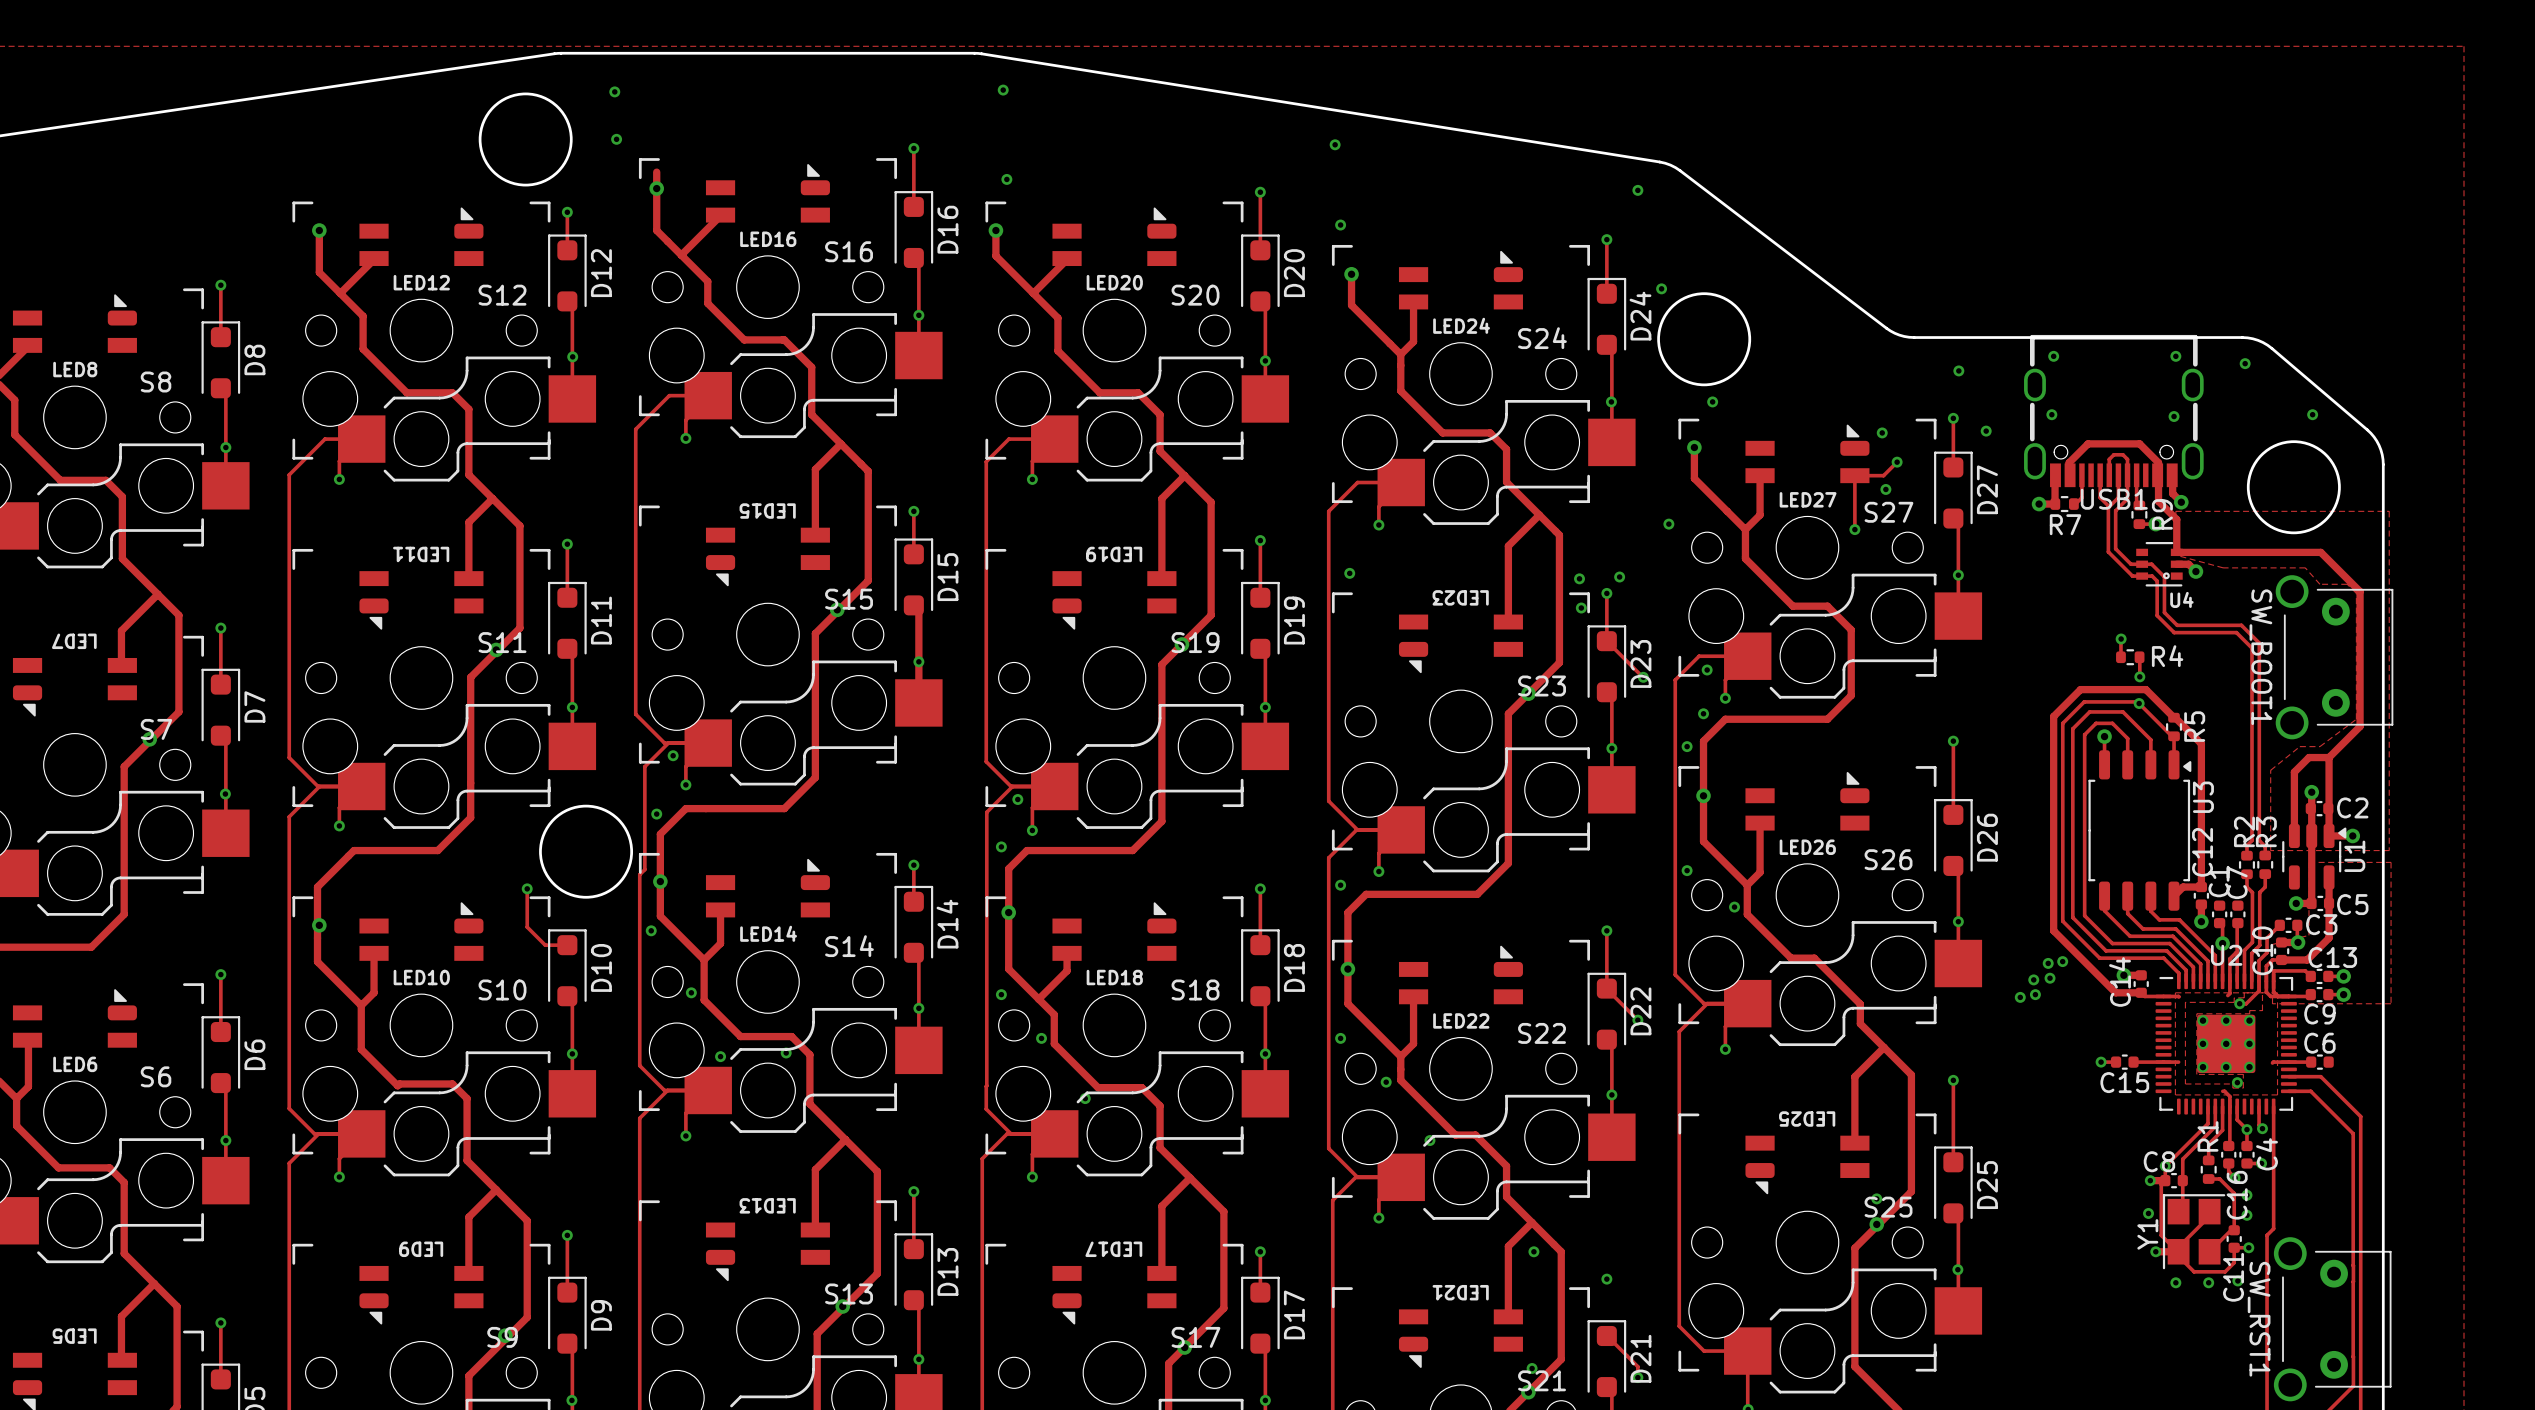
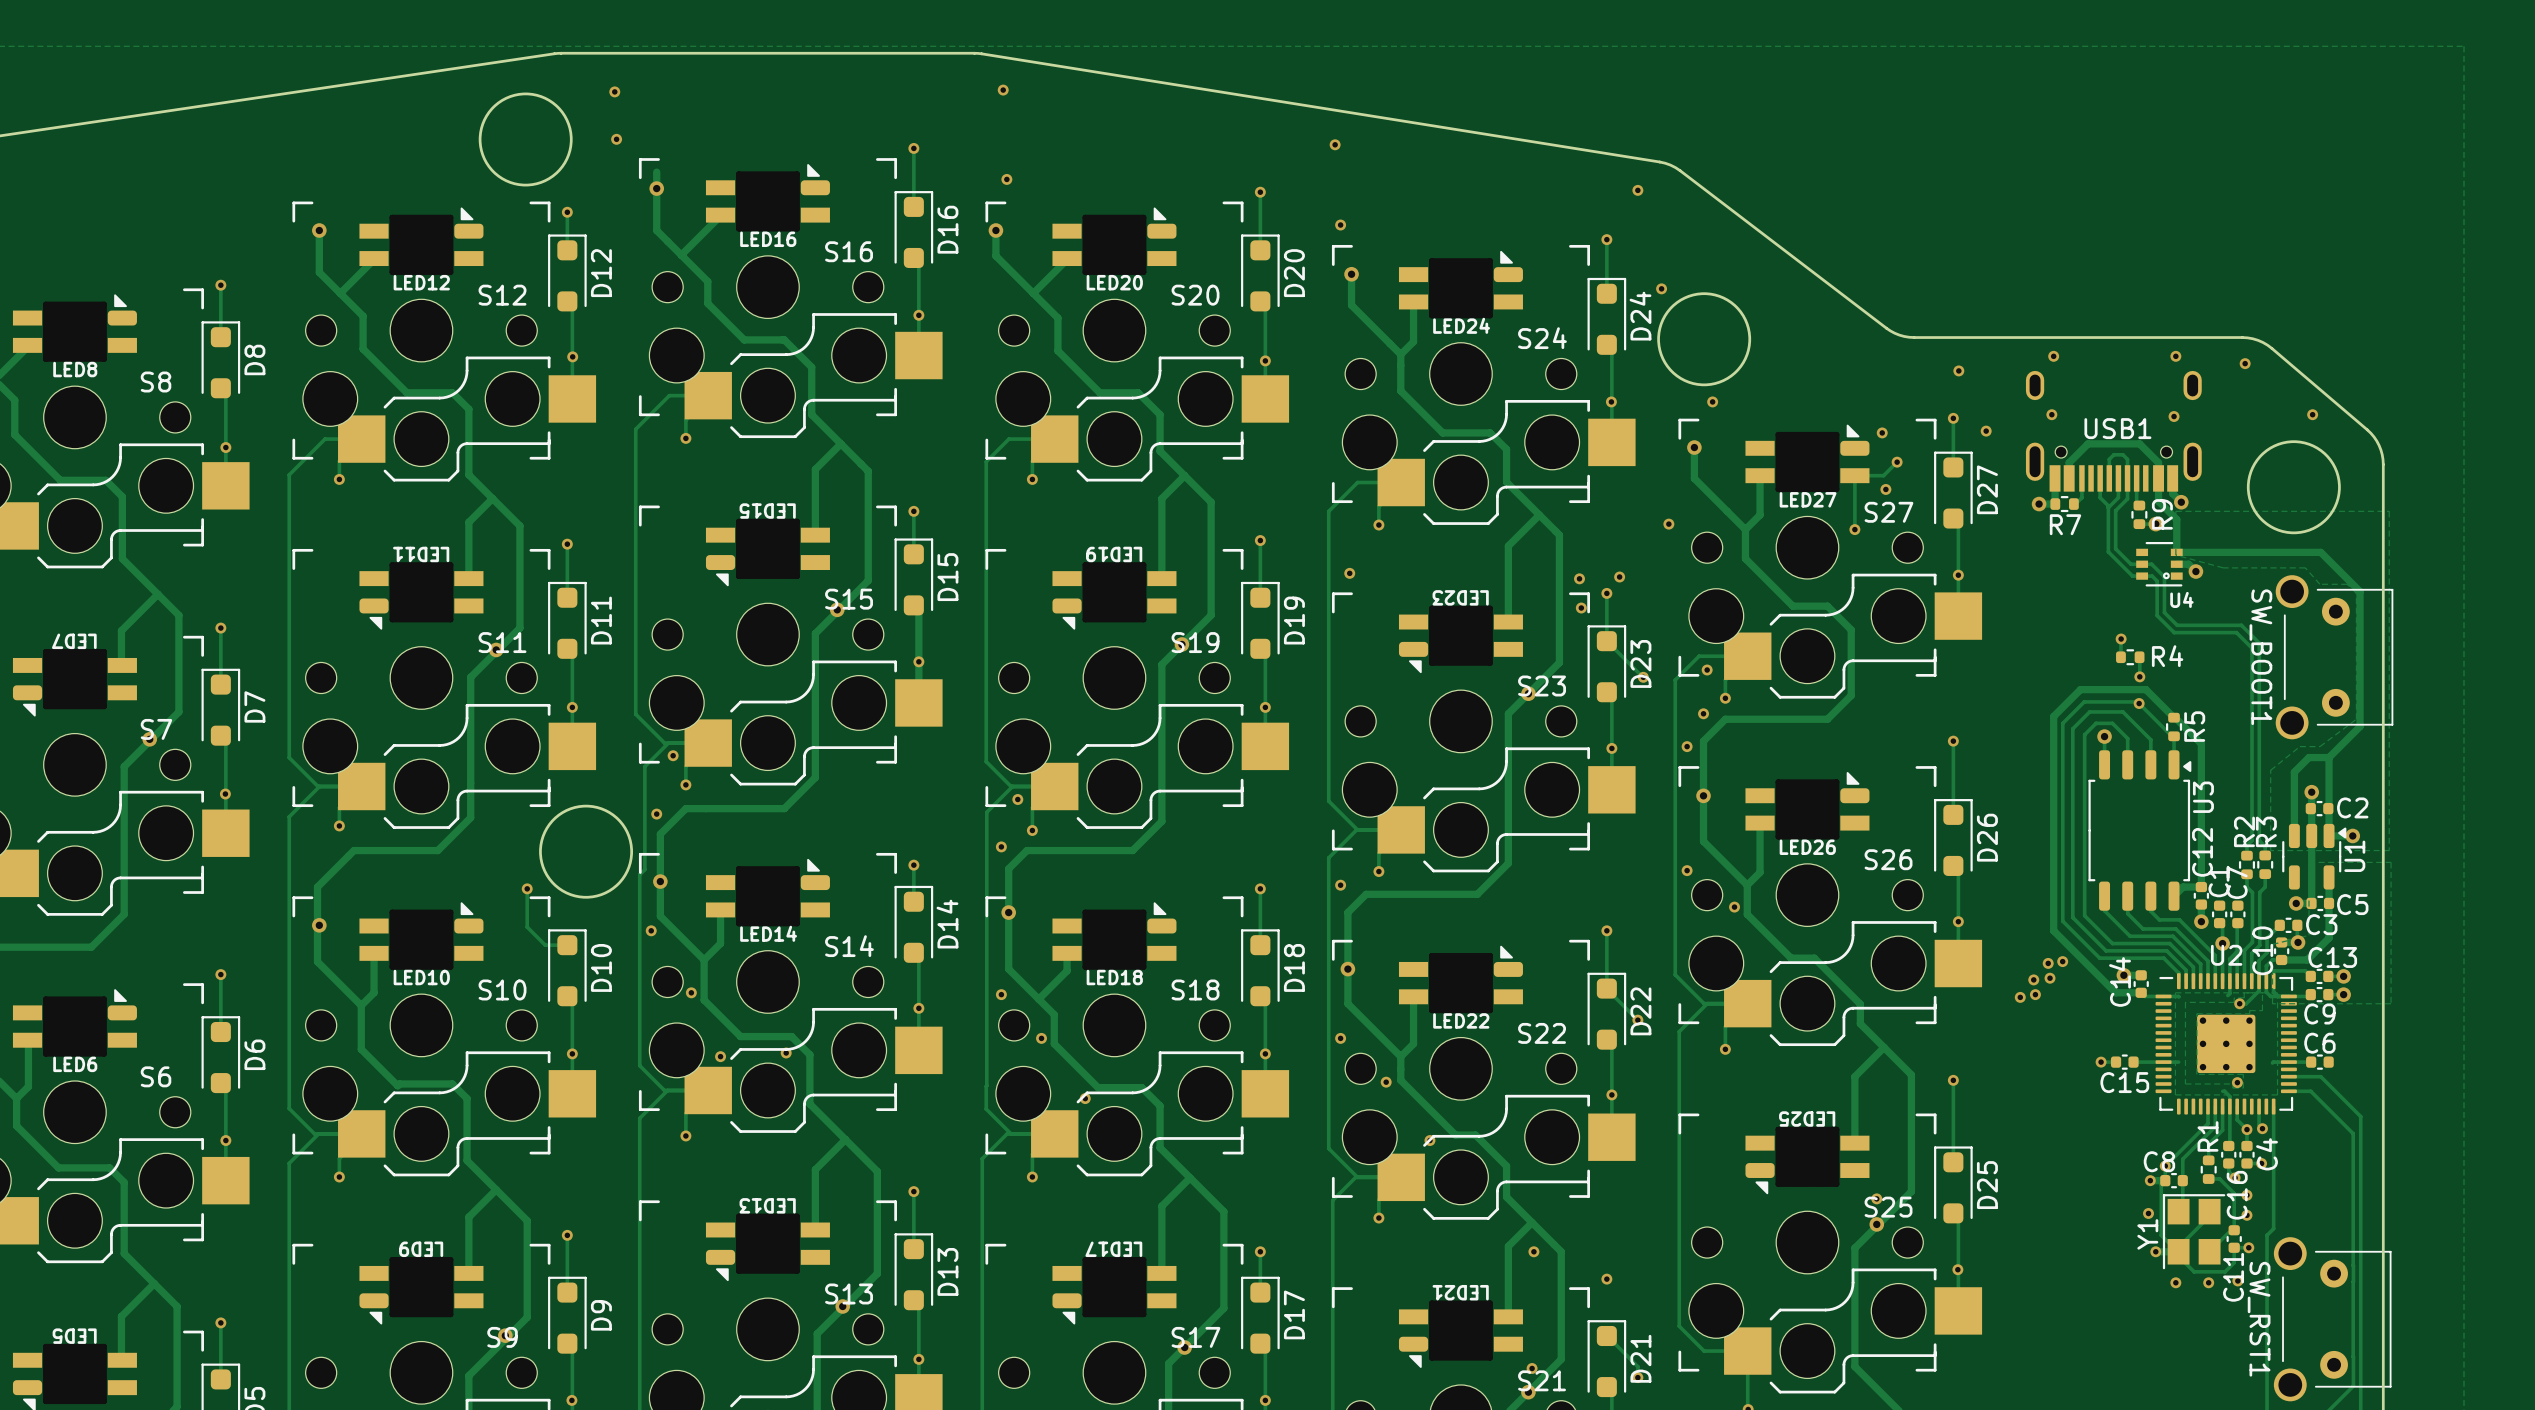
USB1 footprint: [2024, 334, 2204, 488] -> [2025, 370, 2202, 492]
USB1 name position: USB1 (2114, 499) -> USB1 (2117, 428)

